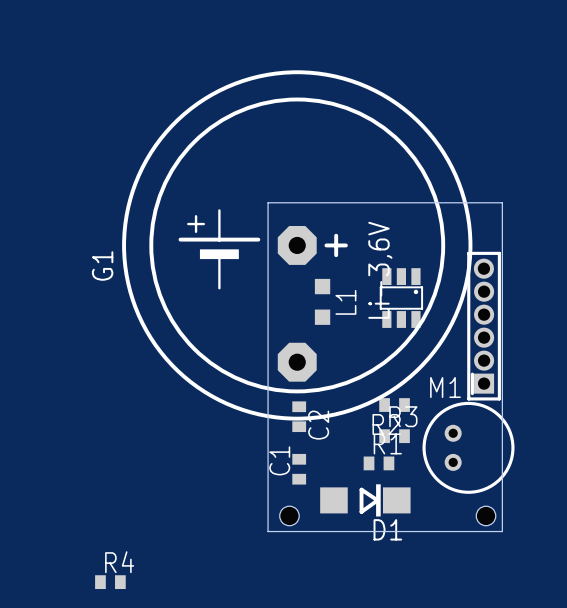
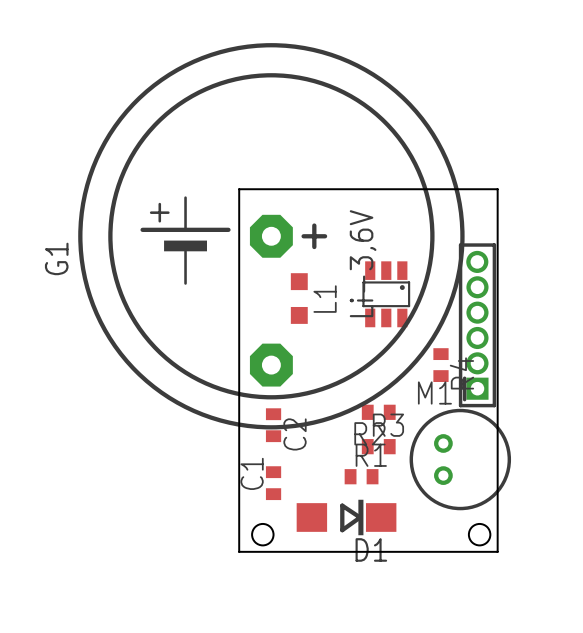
R4 rotation: 0° (110, 582) -> 90° clockwise (440, 365)
R4 position: (110, 582) -> (440, 365)

